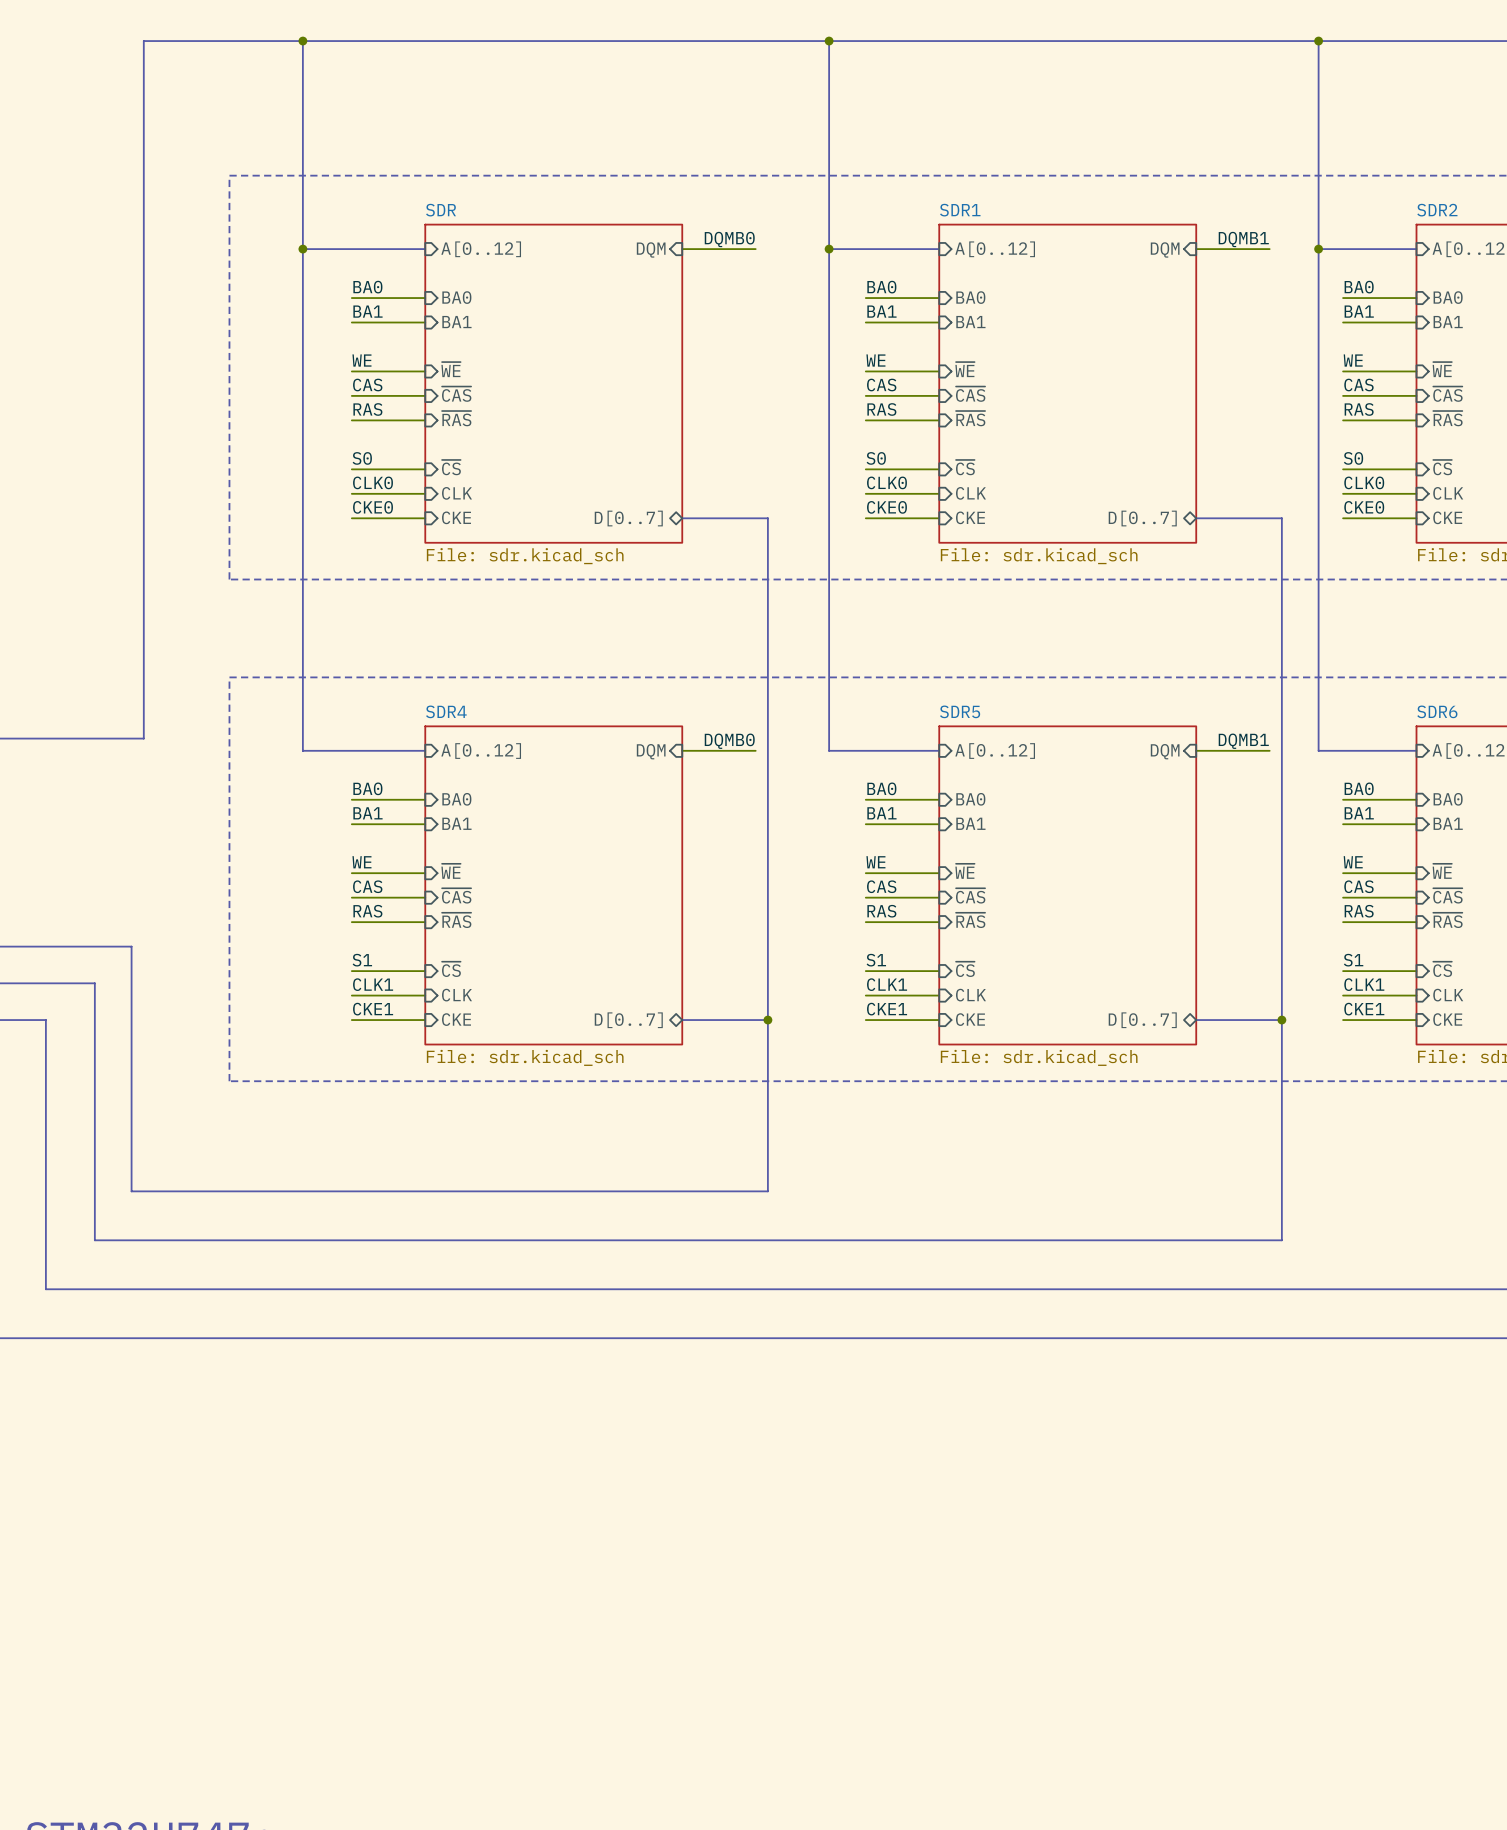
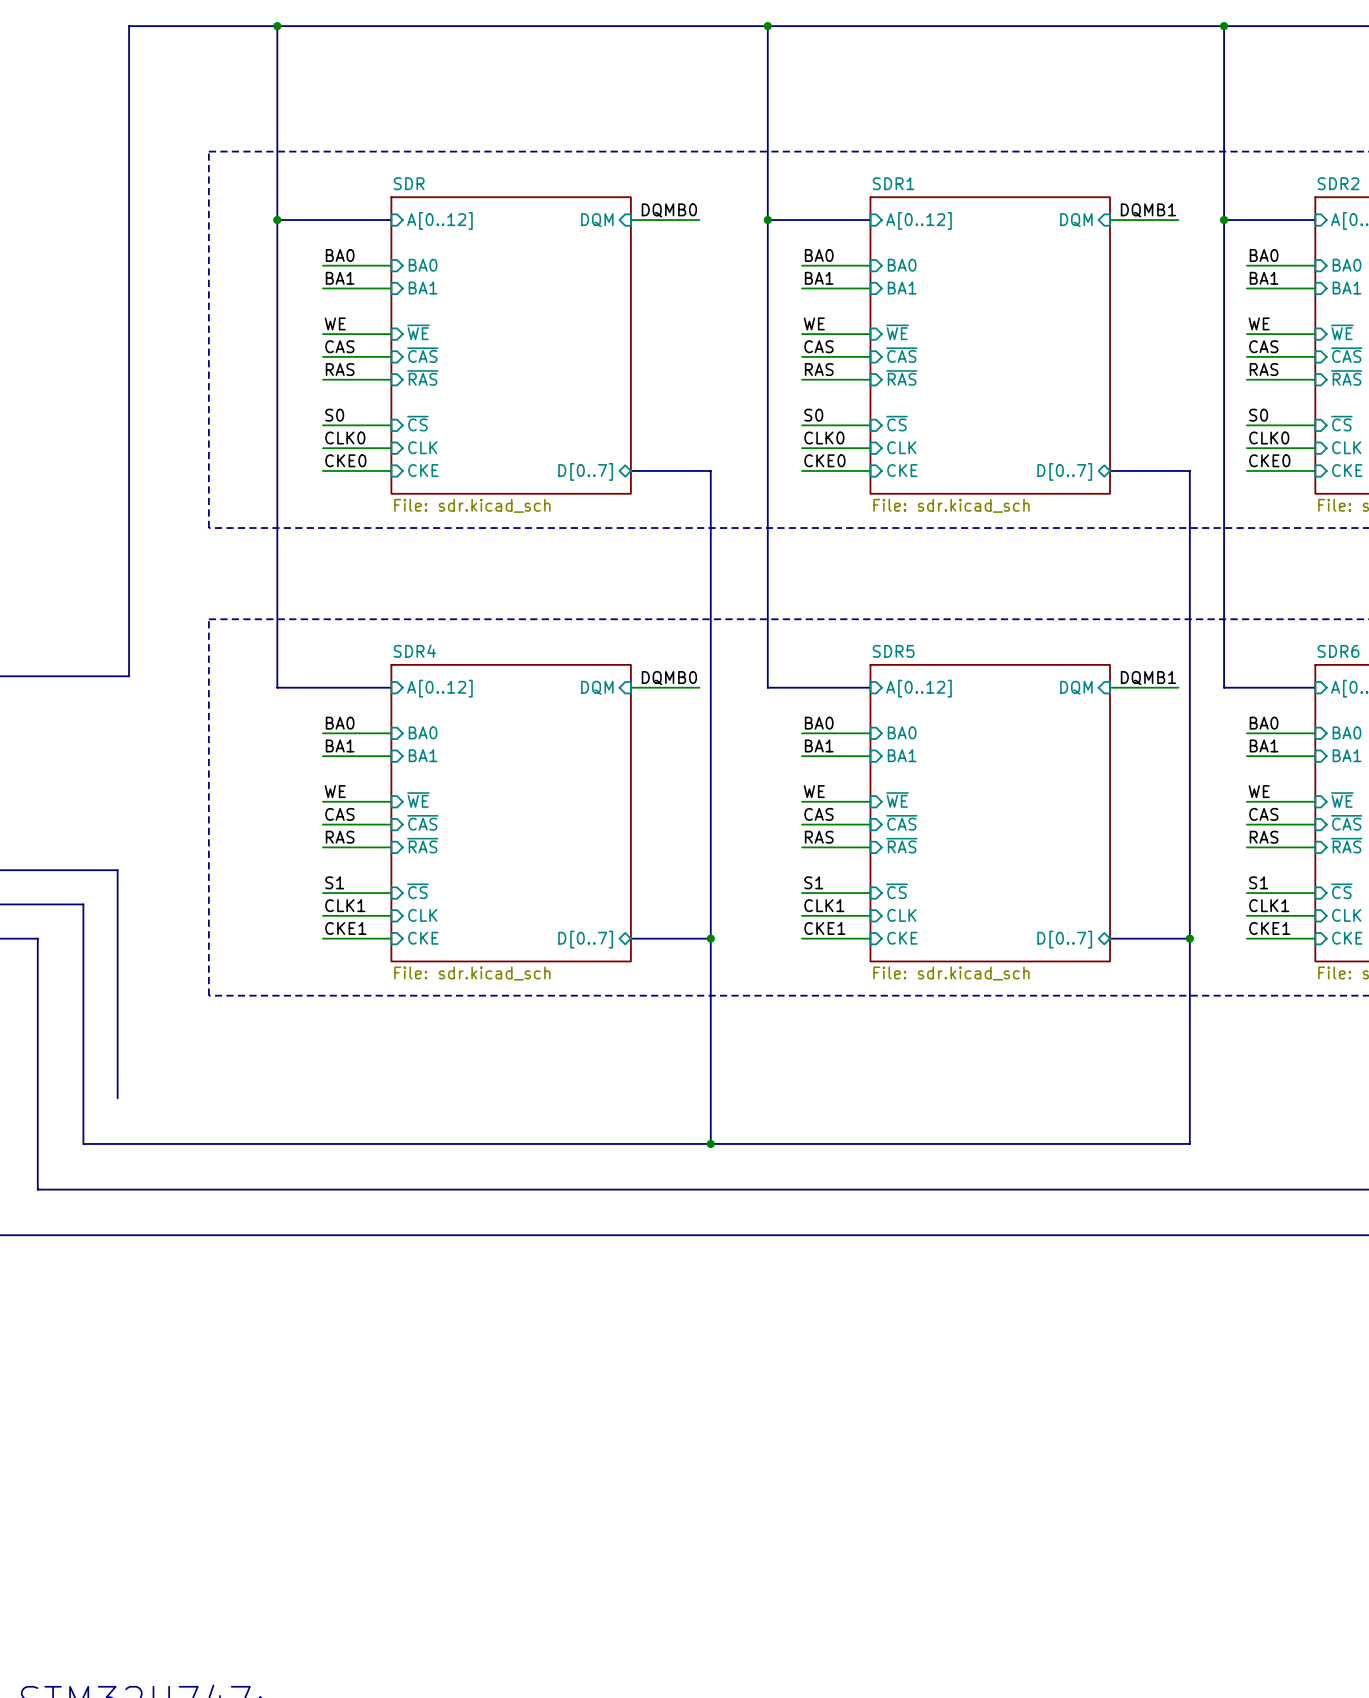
bus: (131, 1191) (767, 1191) -> (710, 1143) (710, 1098)
junction: none -> (710, 1143)

